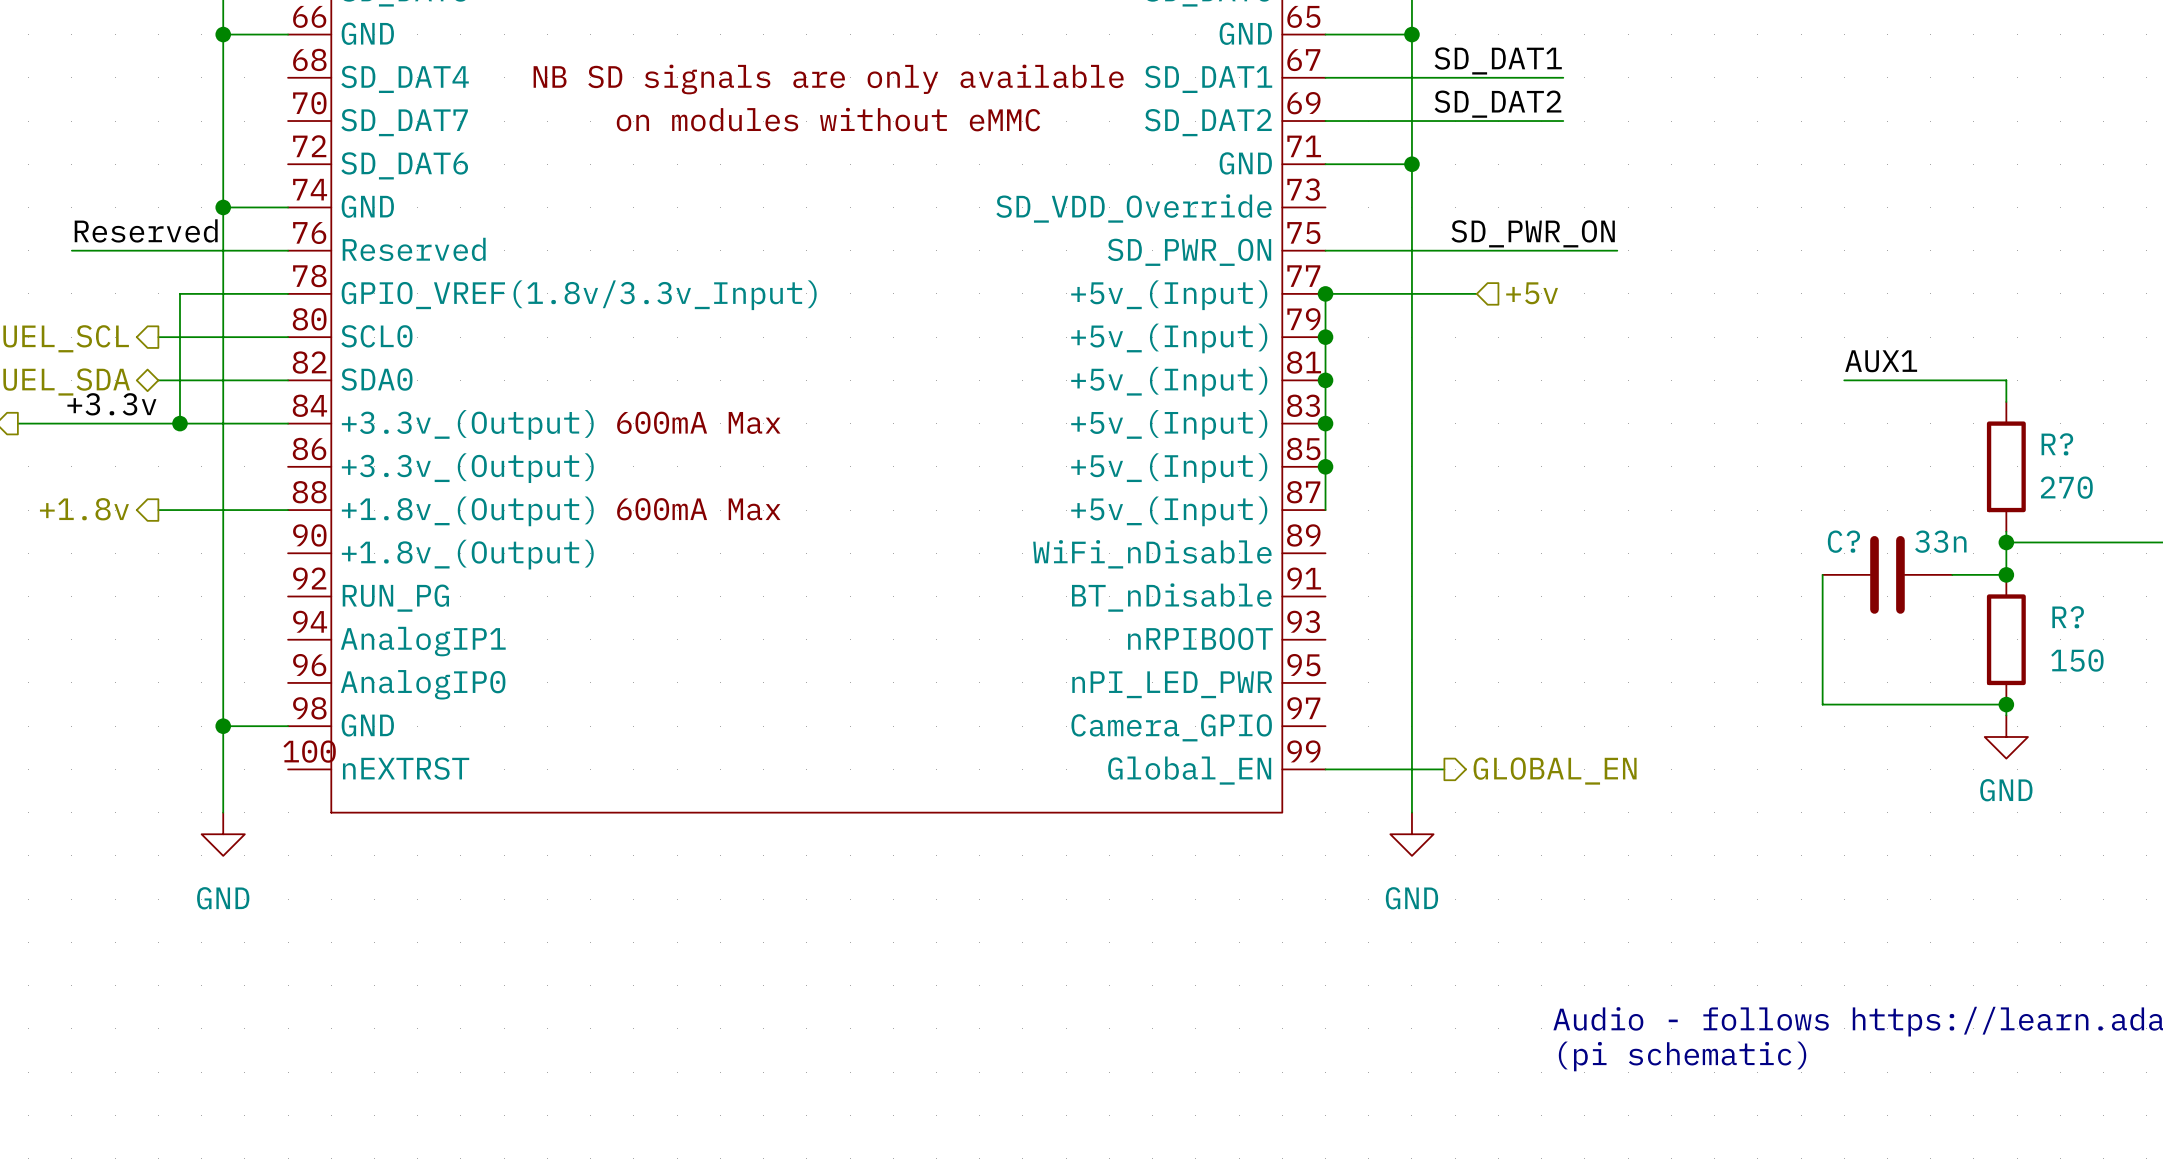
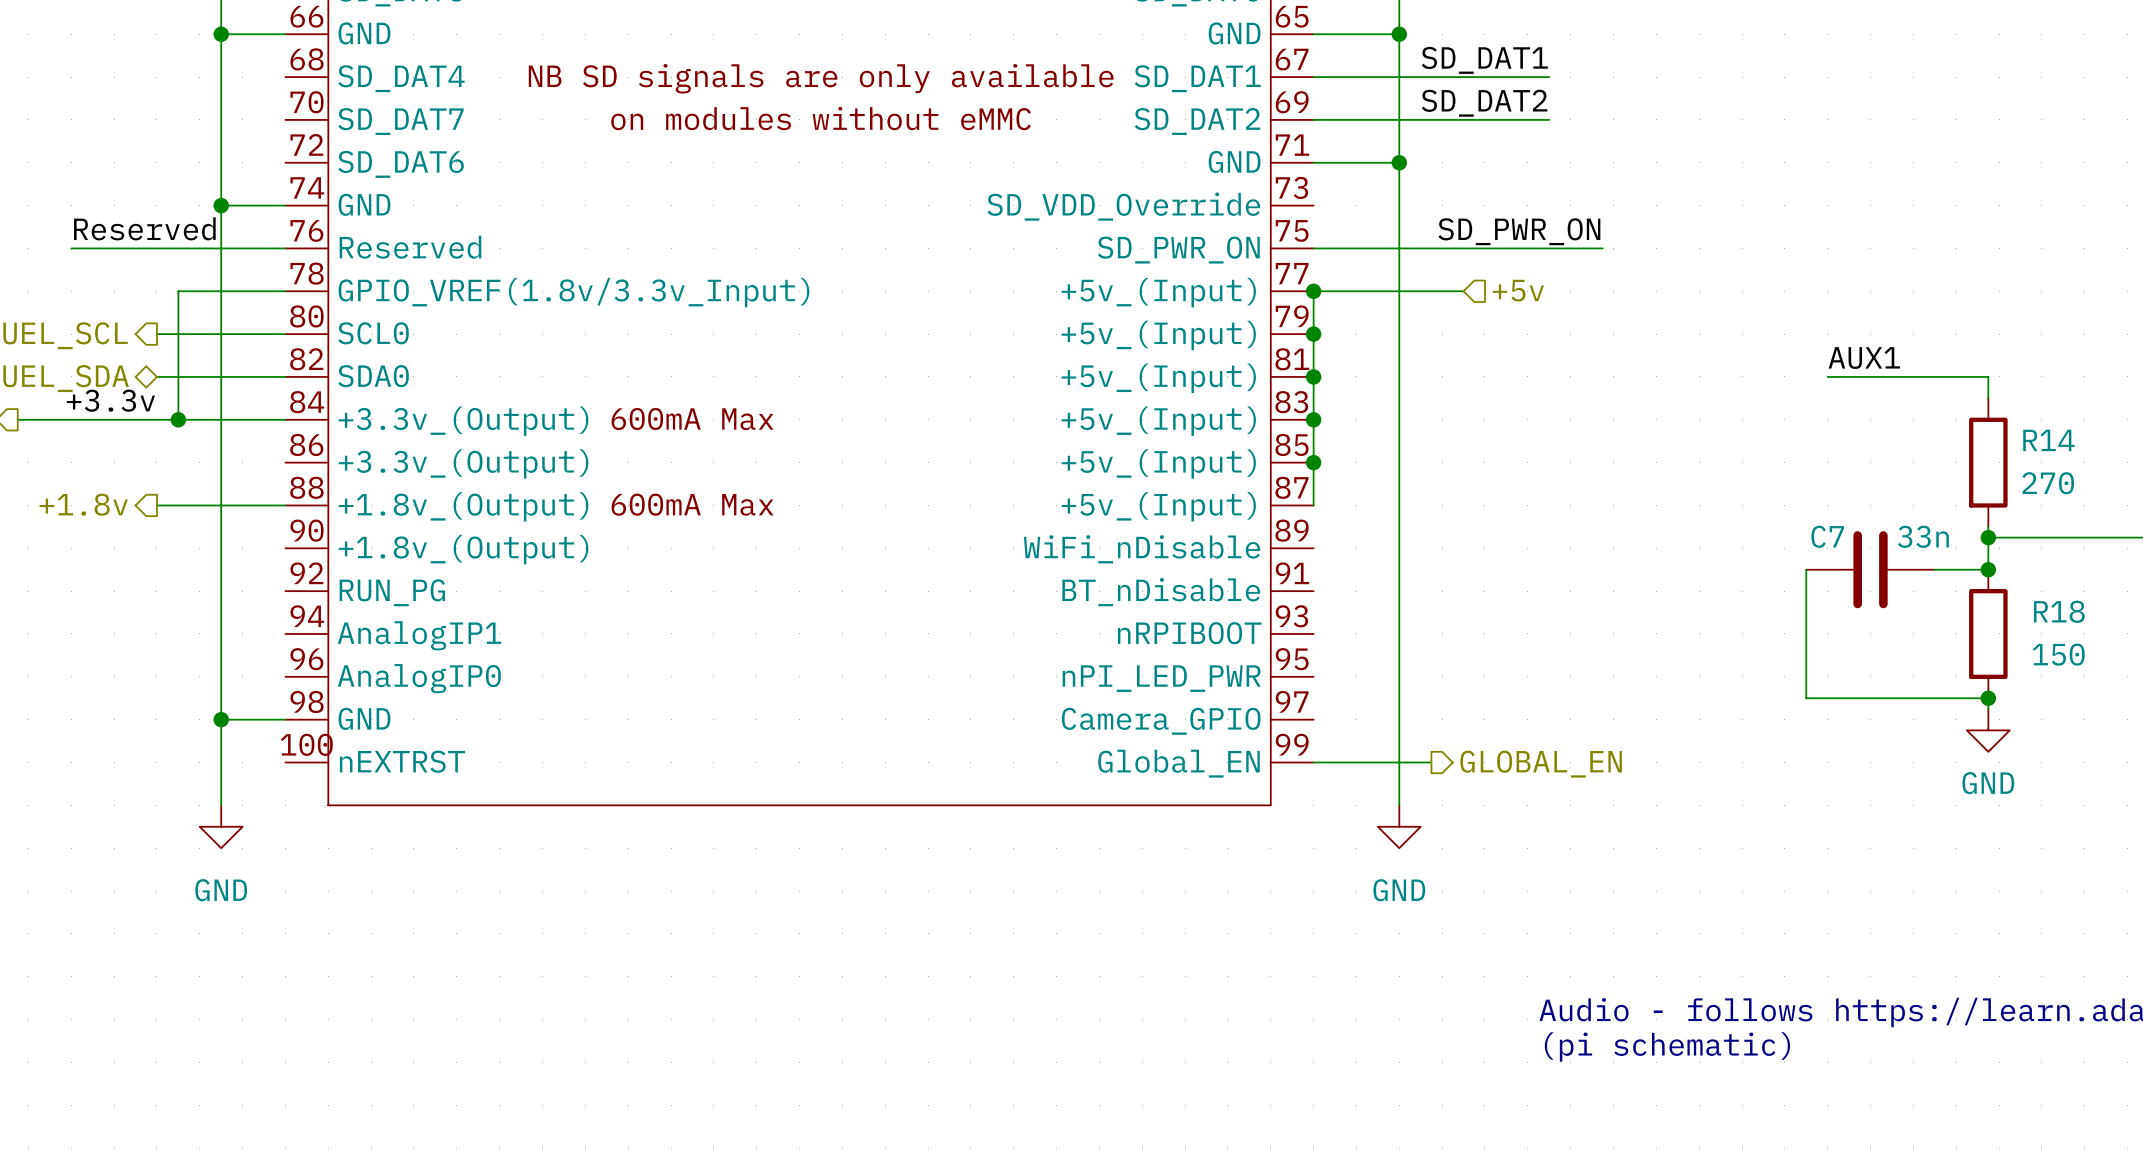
R? name: R? (2057, 444) -> R14 (2048, 440)
C? name: C? (1843, 541) -> C7 (1827, 536)
R? name: R? (2068, 617) -> R18 (2059, 611)

